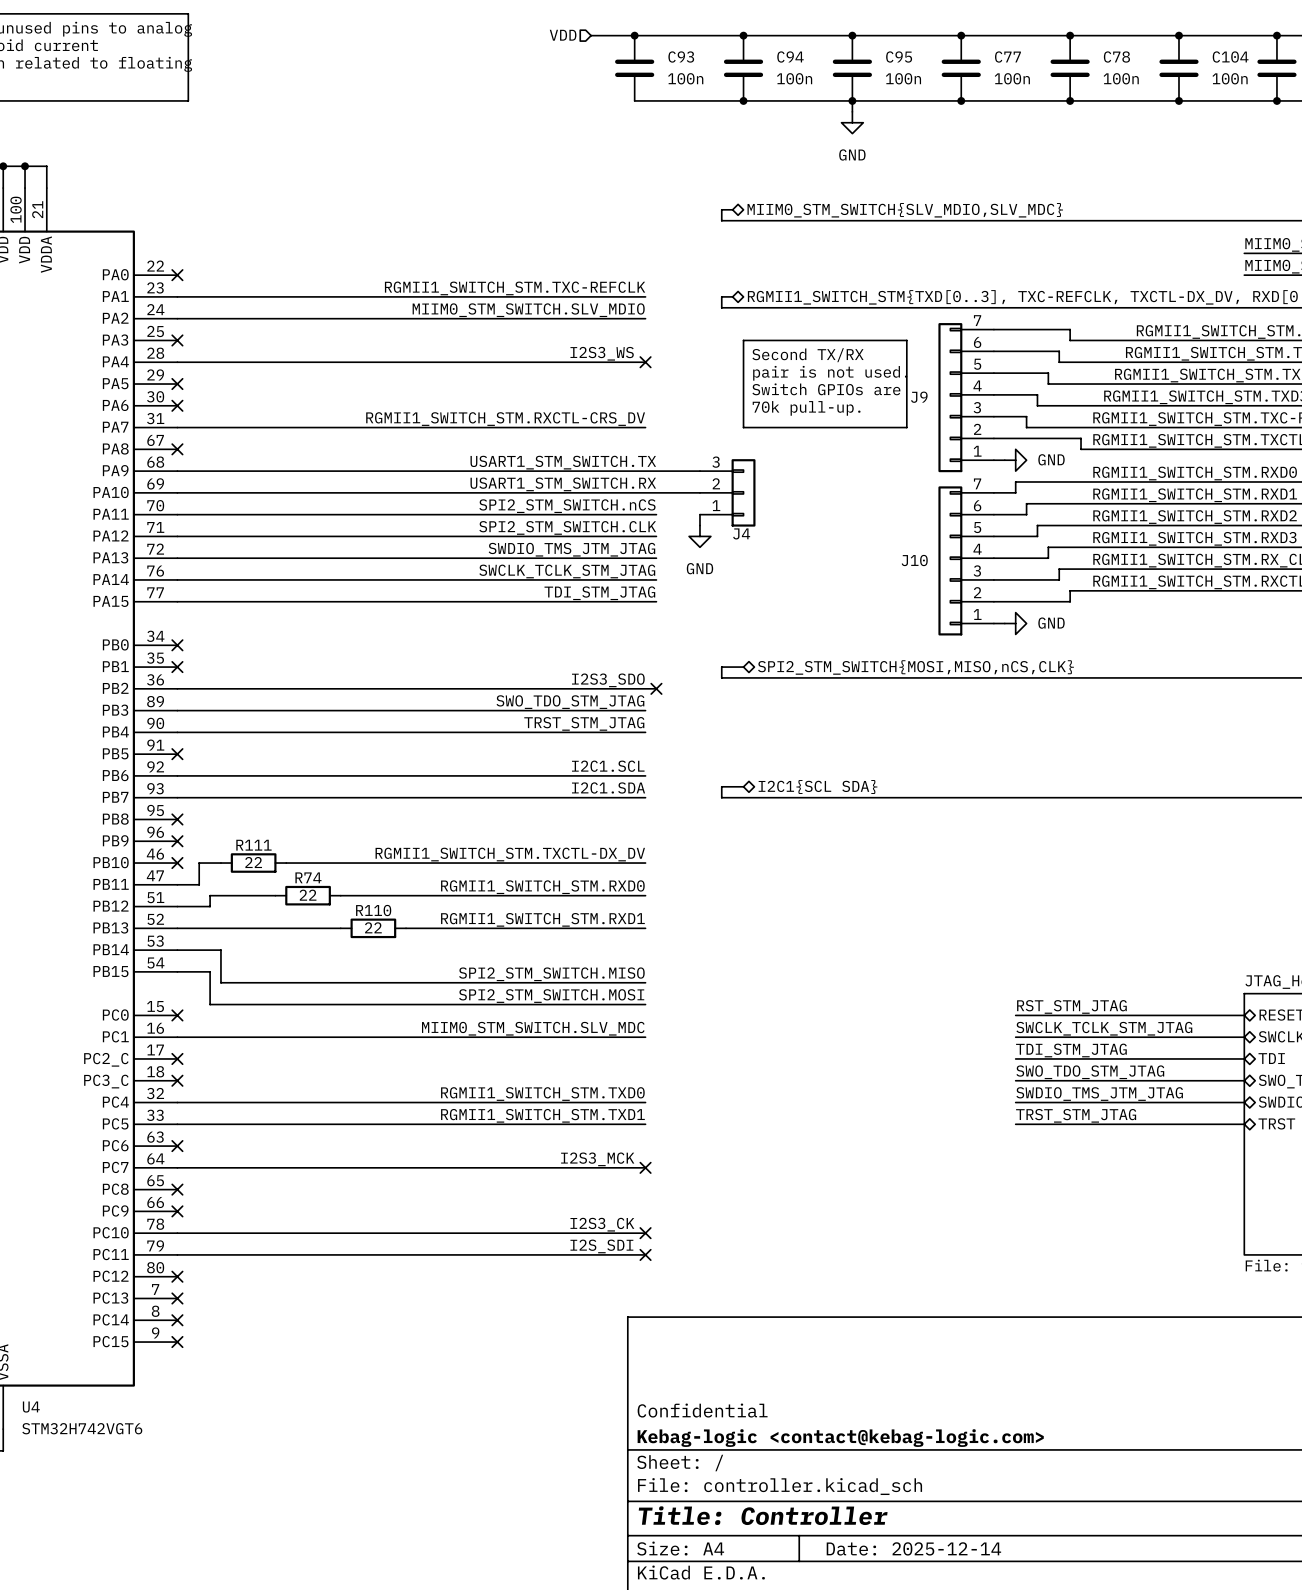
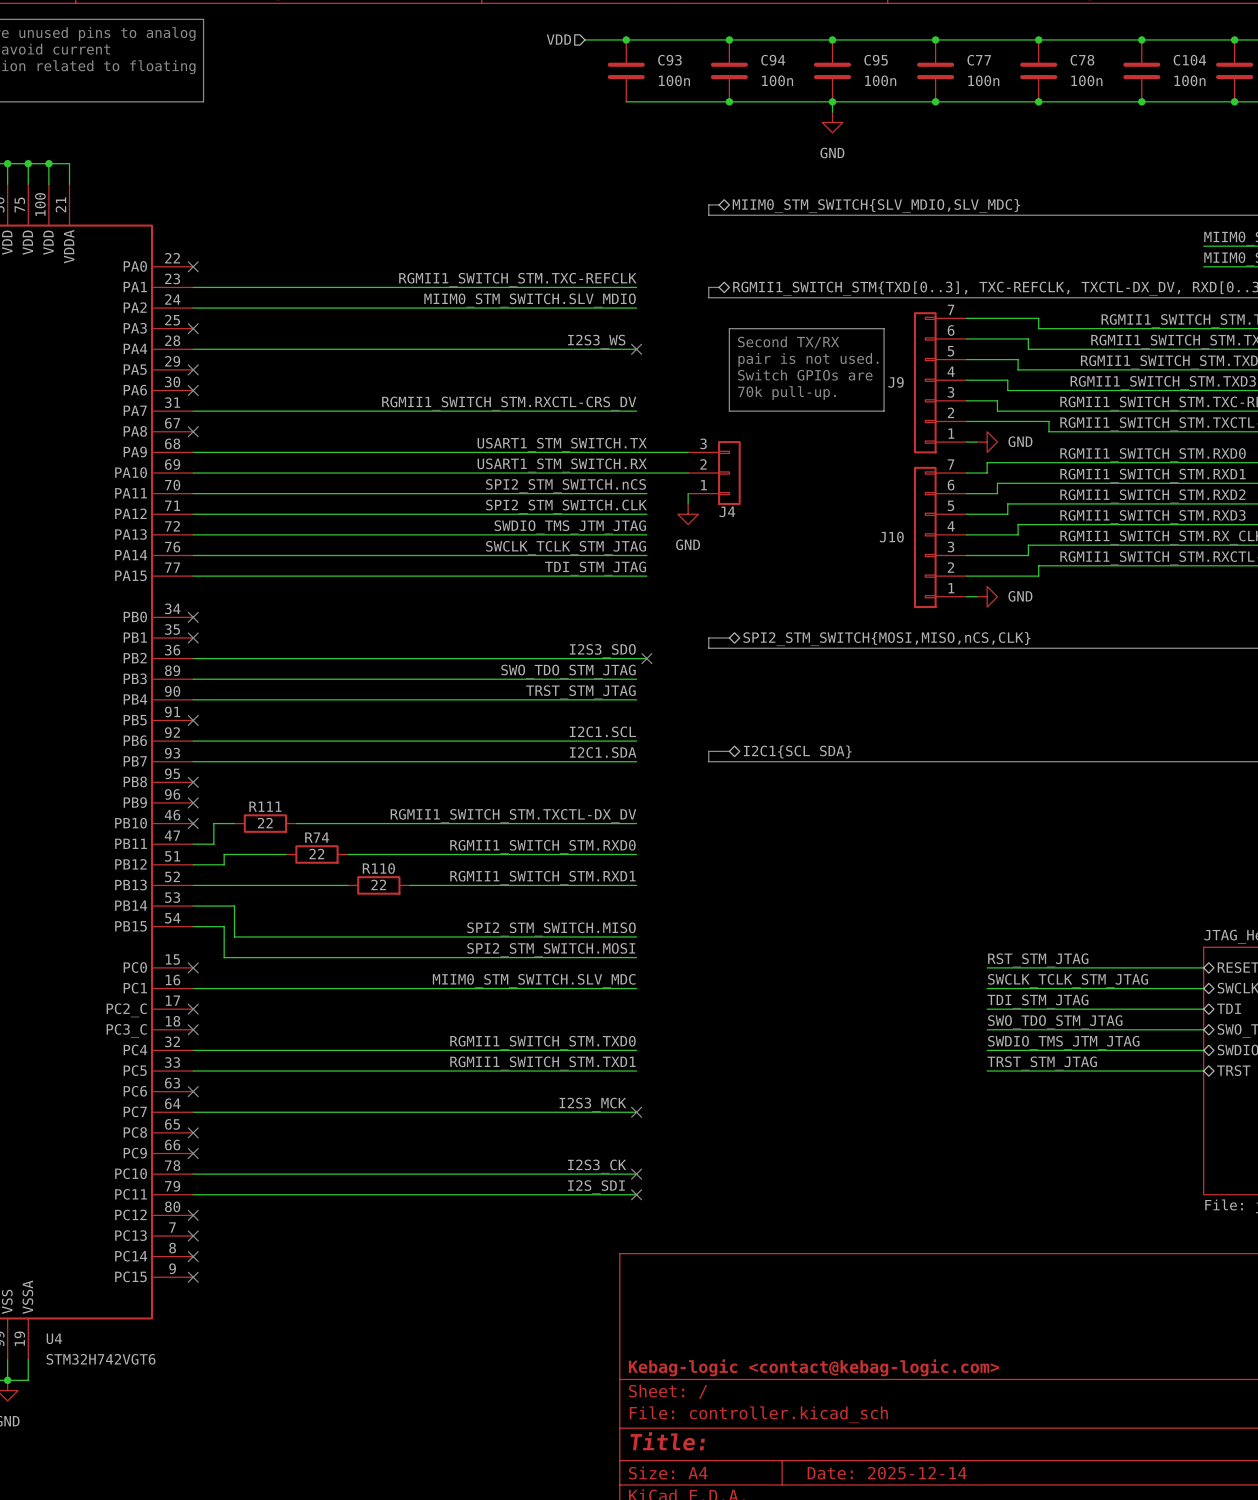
title block: Confidential (702, 1410) -> none
title block: Title: Controller (763, 1515) -> Title: (667, 1441)

